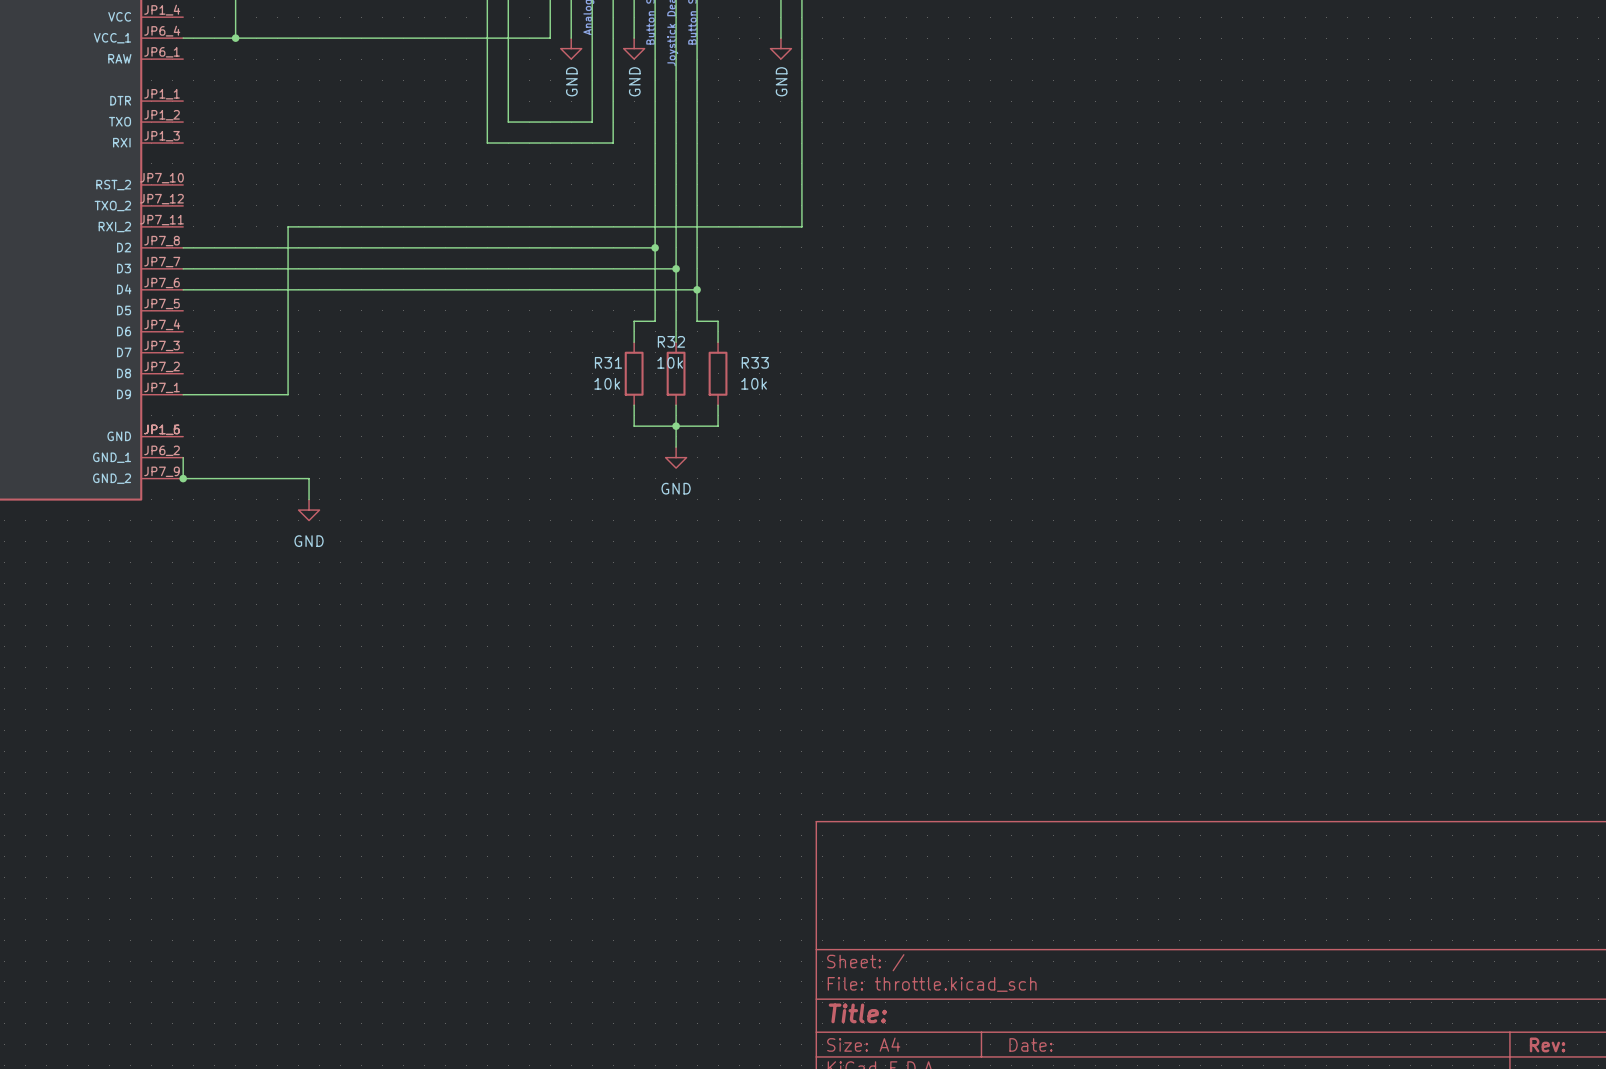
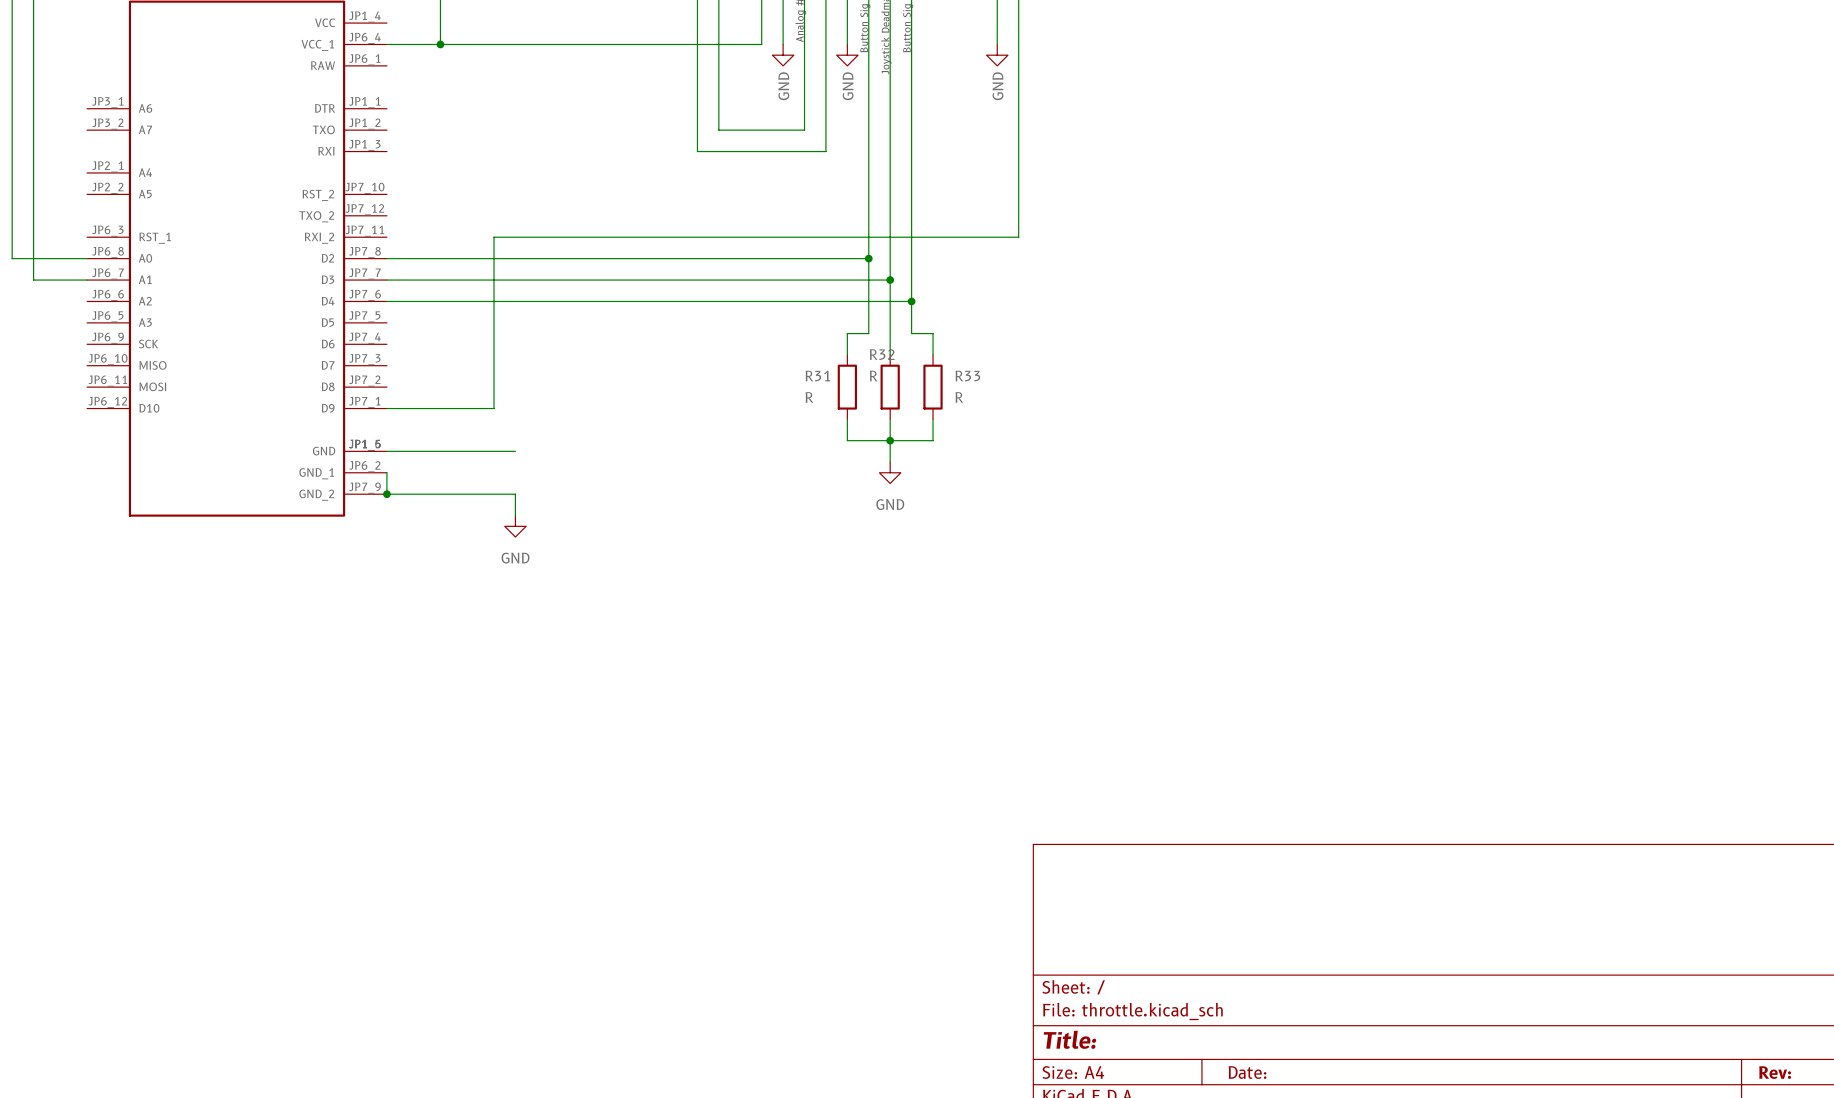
R32 value: 10k (670, 362) -> R (873, 376)
R31 value: 10k (607, 383) -> R (809, 397)
R33 value: 10k (754, 383) -> R (959, 397)
wire: none -> (386, 451) (515, 451)

